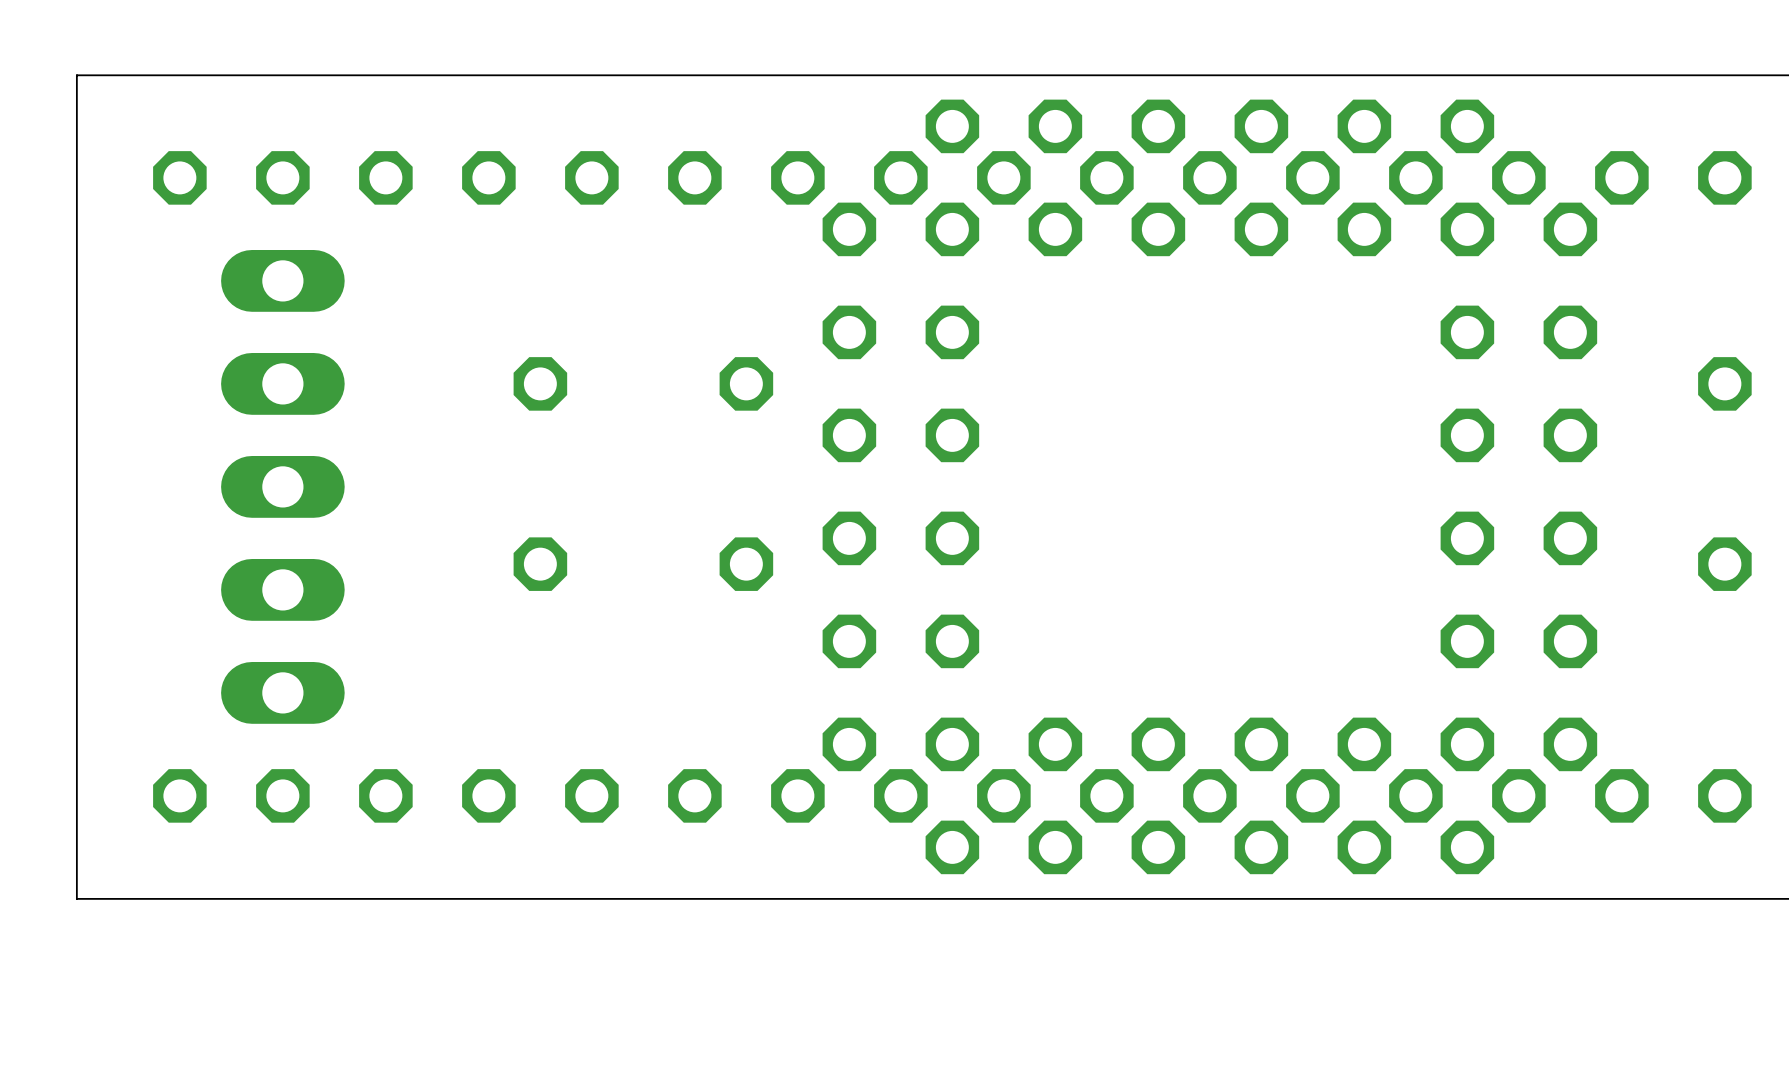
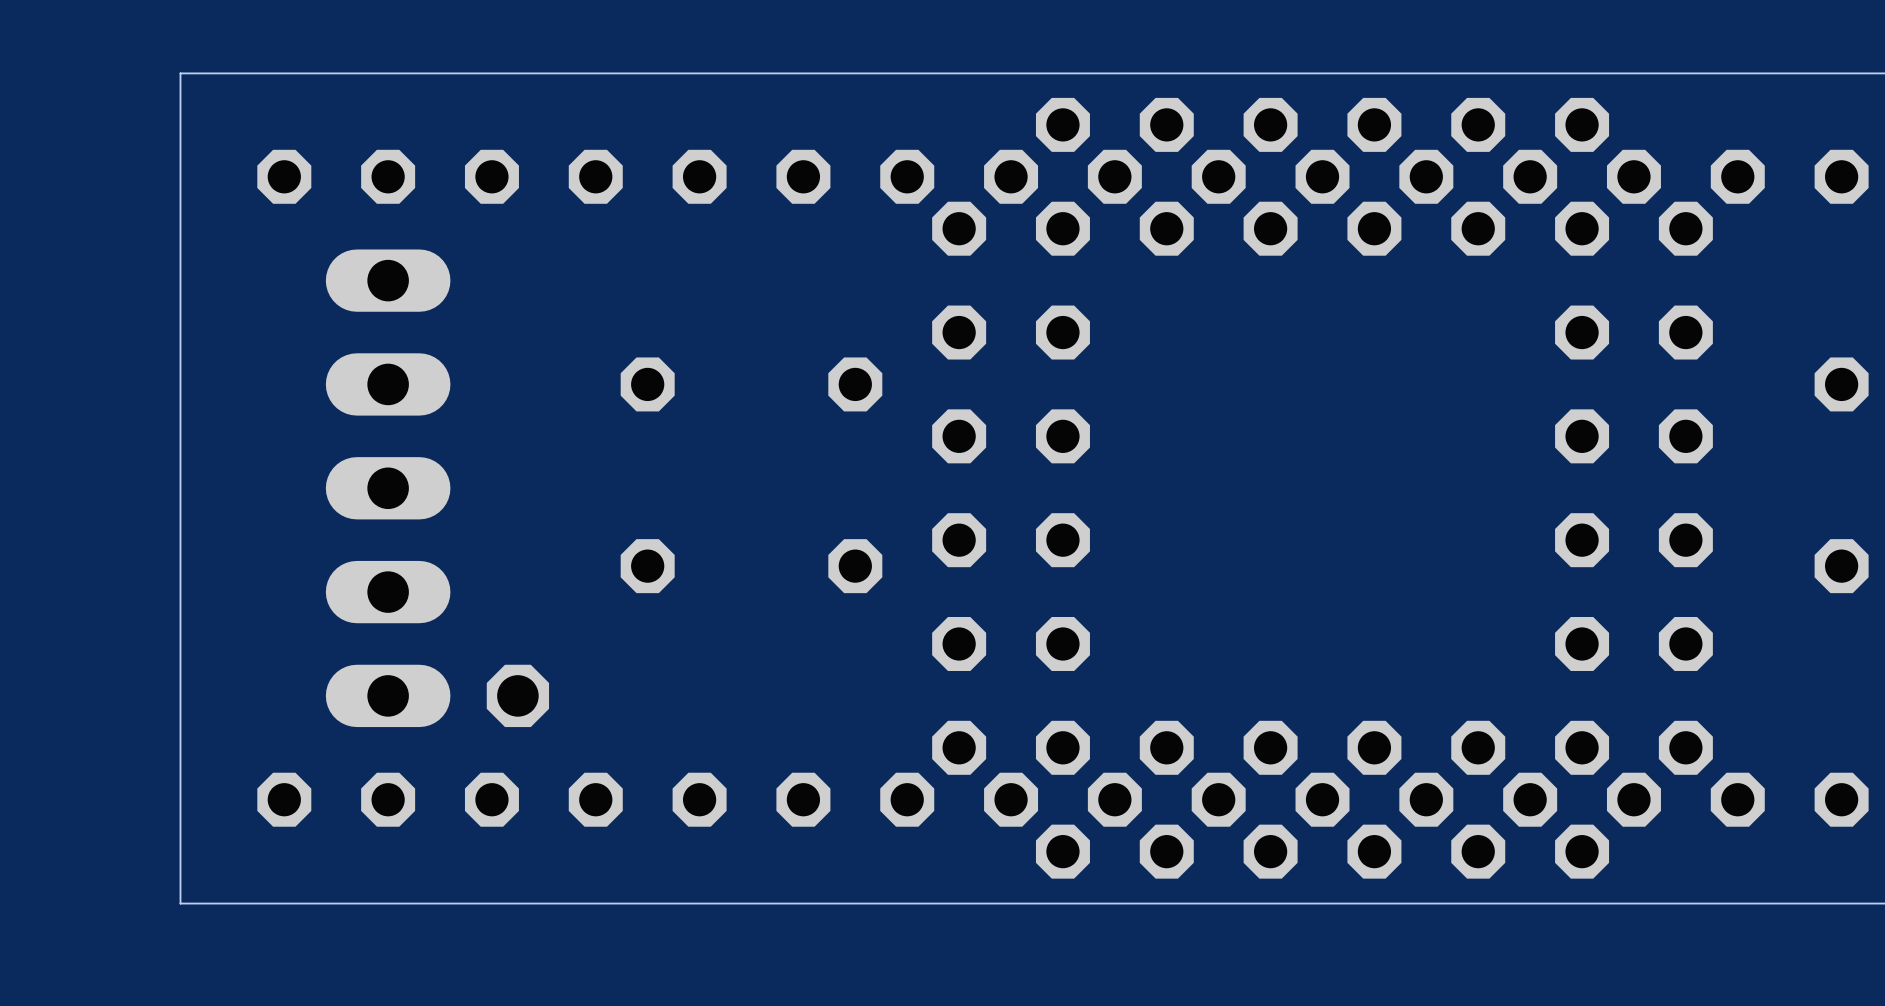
part: none -> (517, 695)

